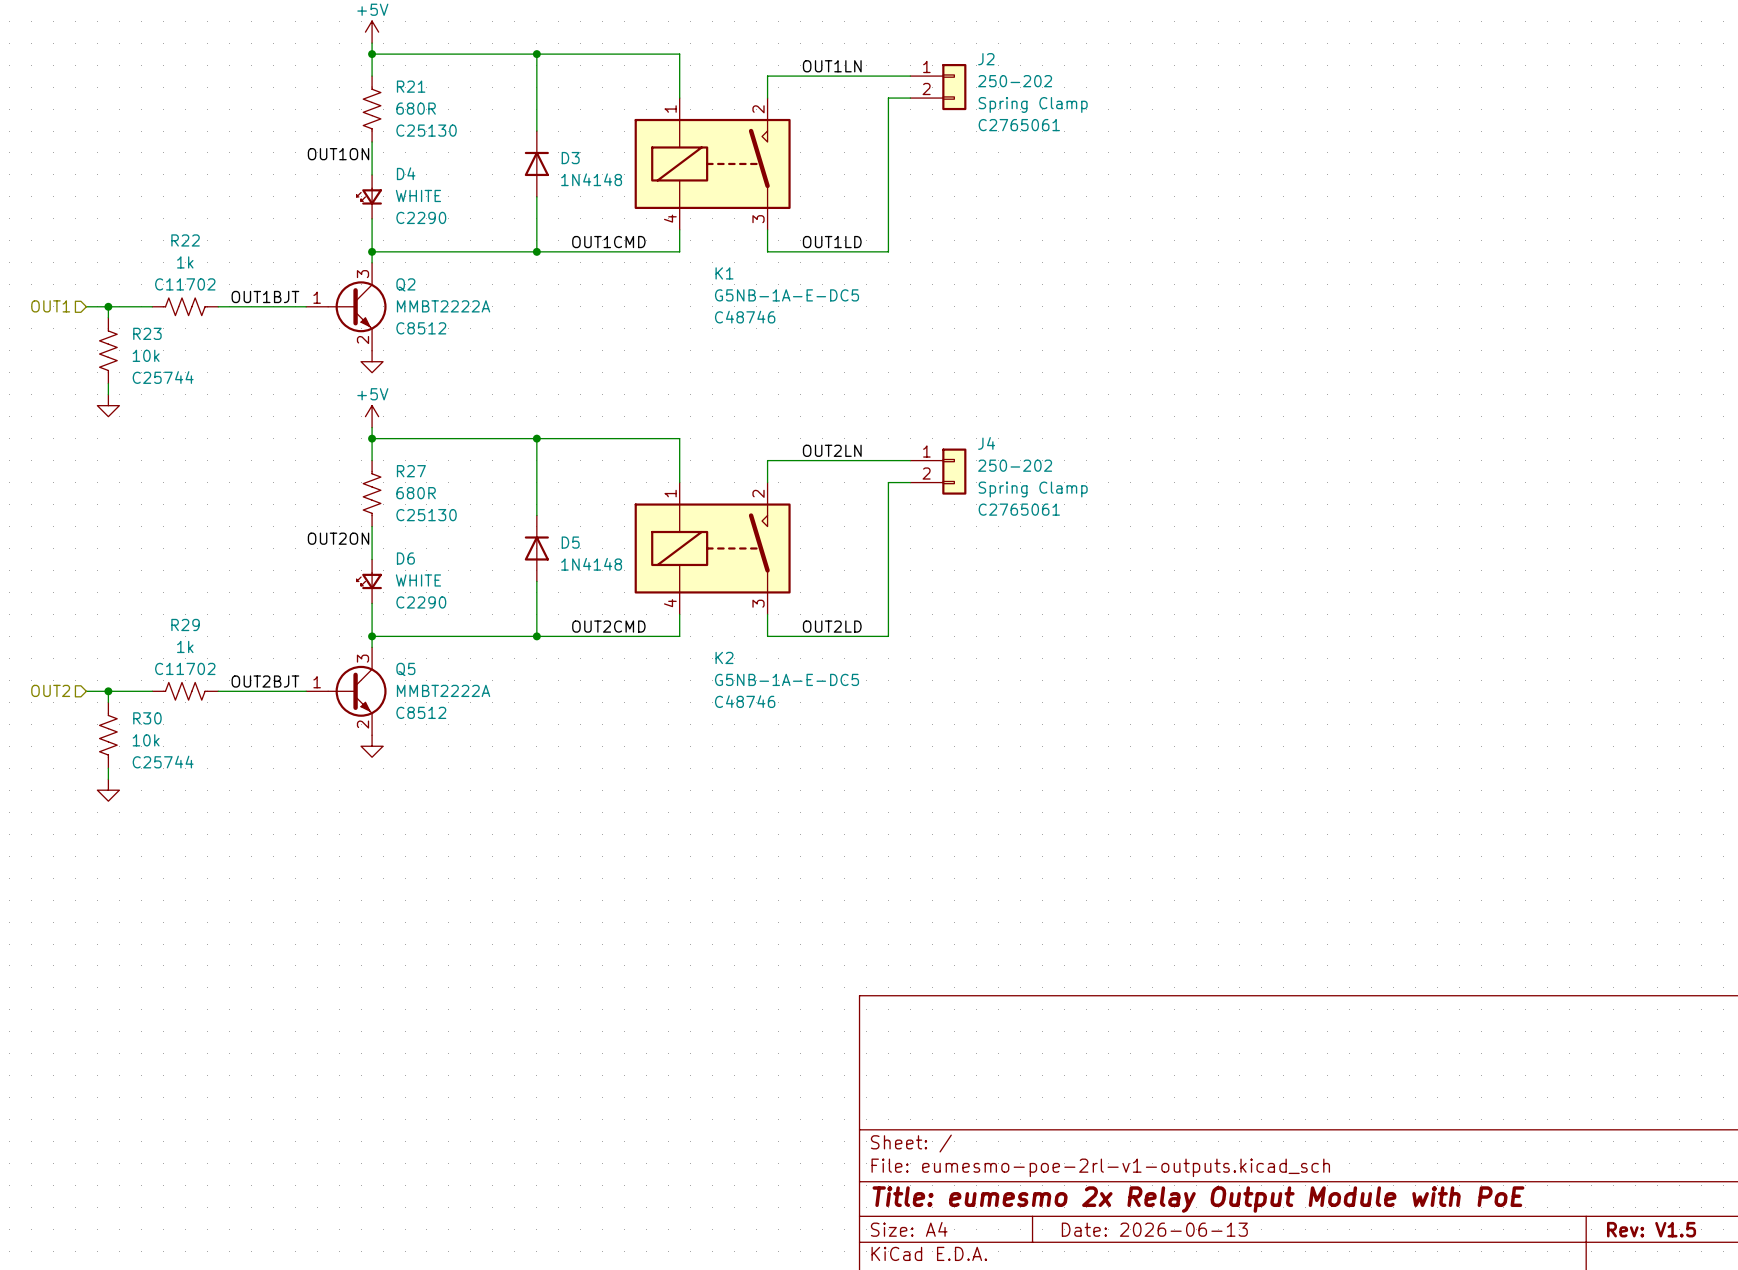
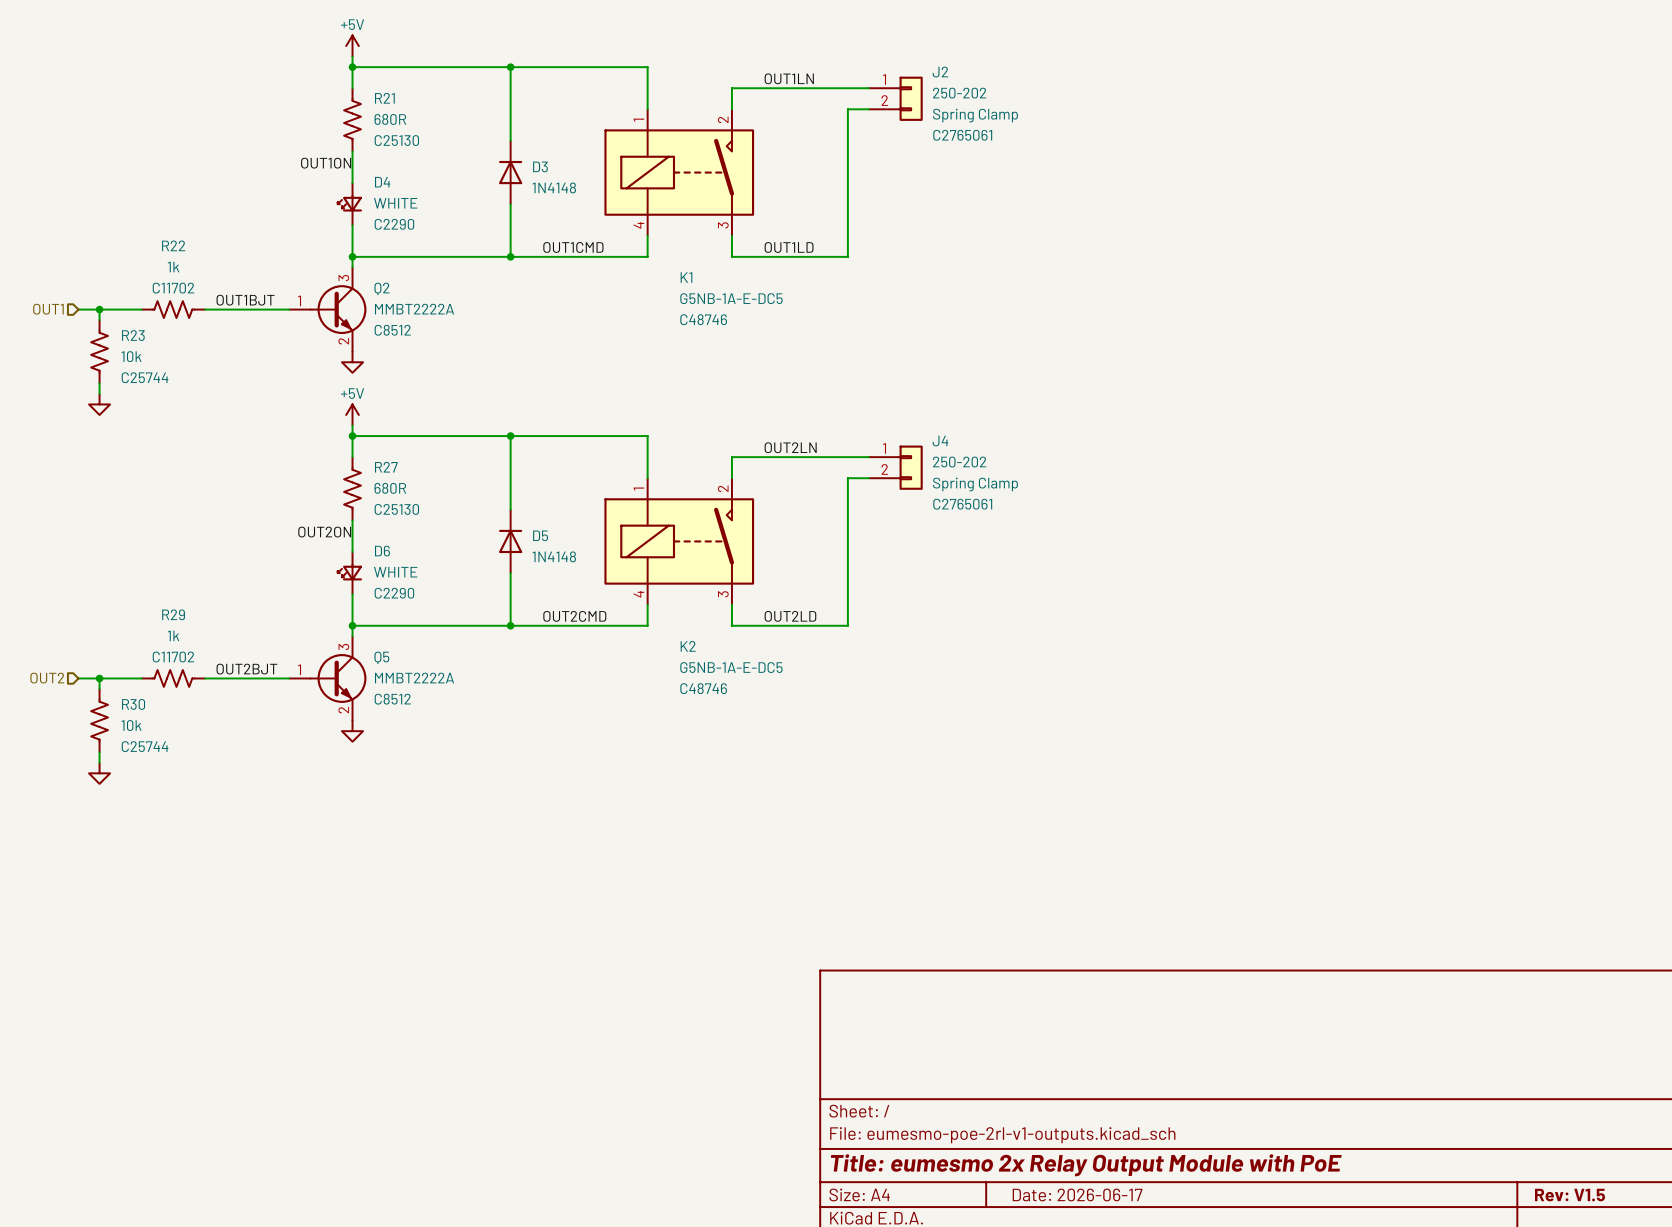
title block: Date: 2026-06-13 (1154, 1229) -> Date: 2026-06-17 (1077, 1194)

